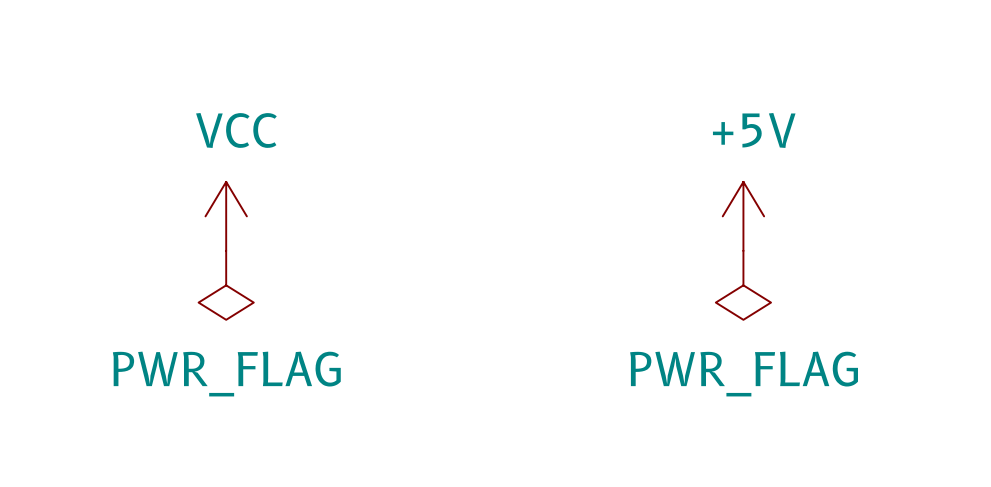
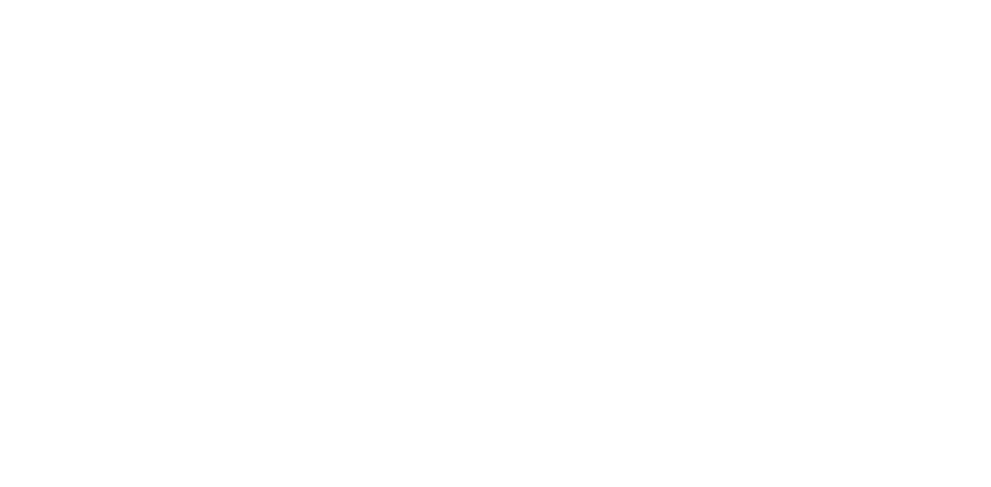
power symbol: VCC (226, 216) -> none
power symbol: +5V (743, 216) -> none
power symbol: PWR_FLAG (226, 285) -> none
power symbol: PWR_FLAG (743, 285) -> none

